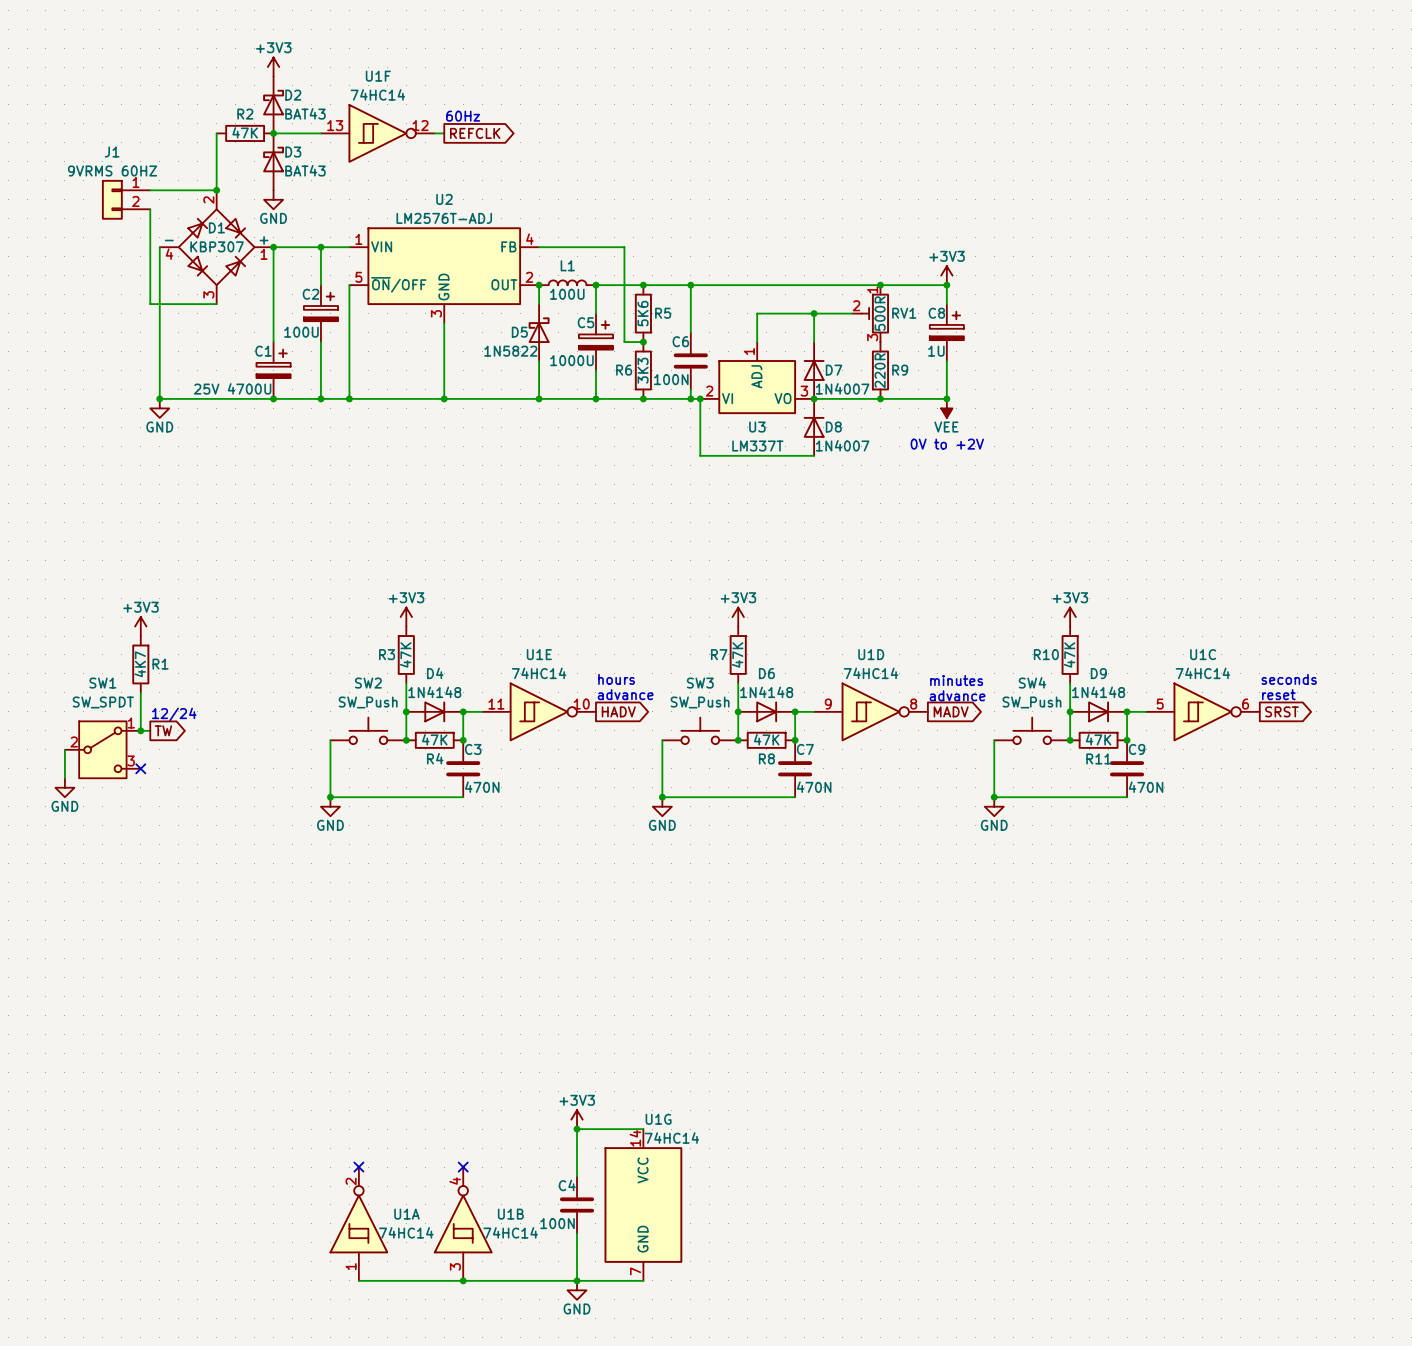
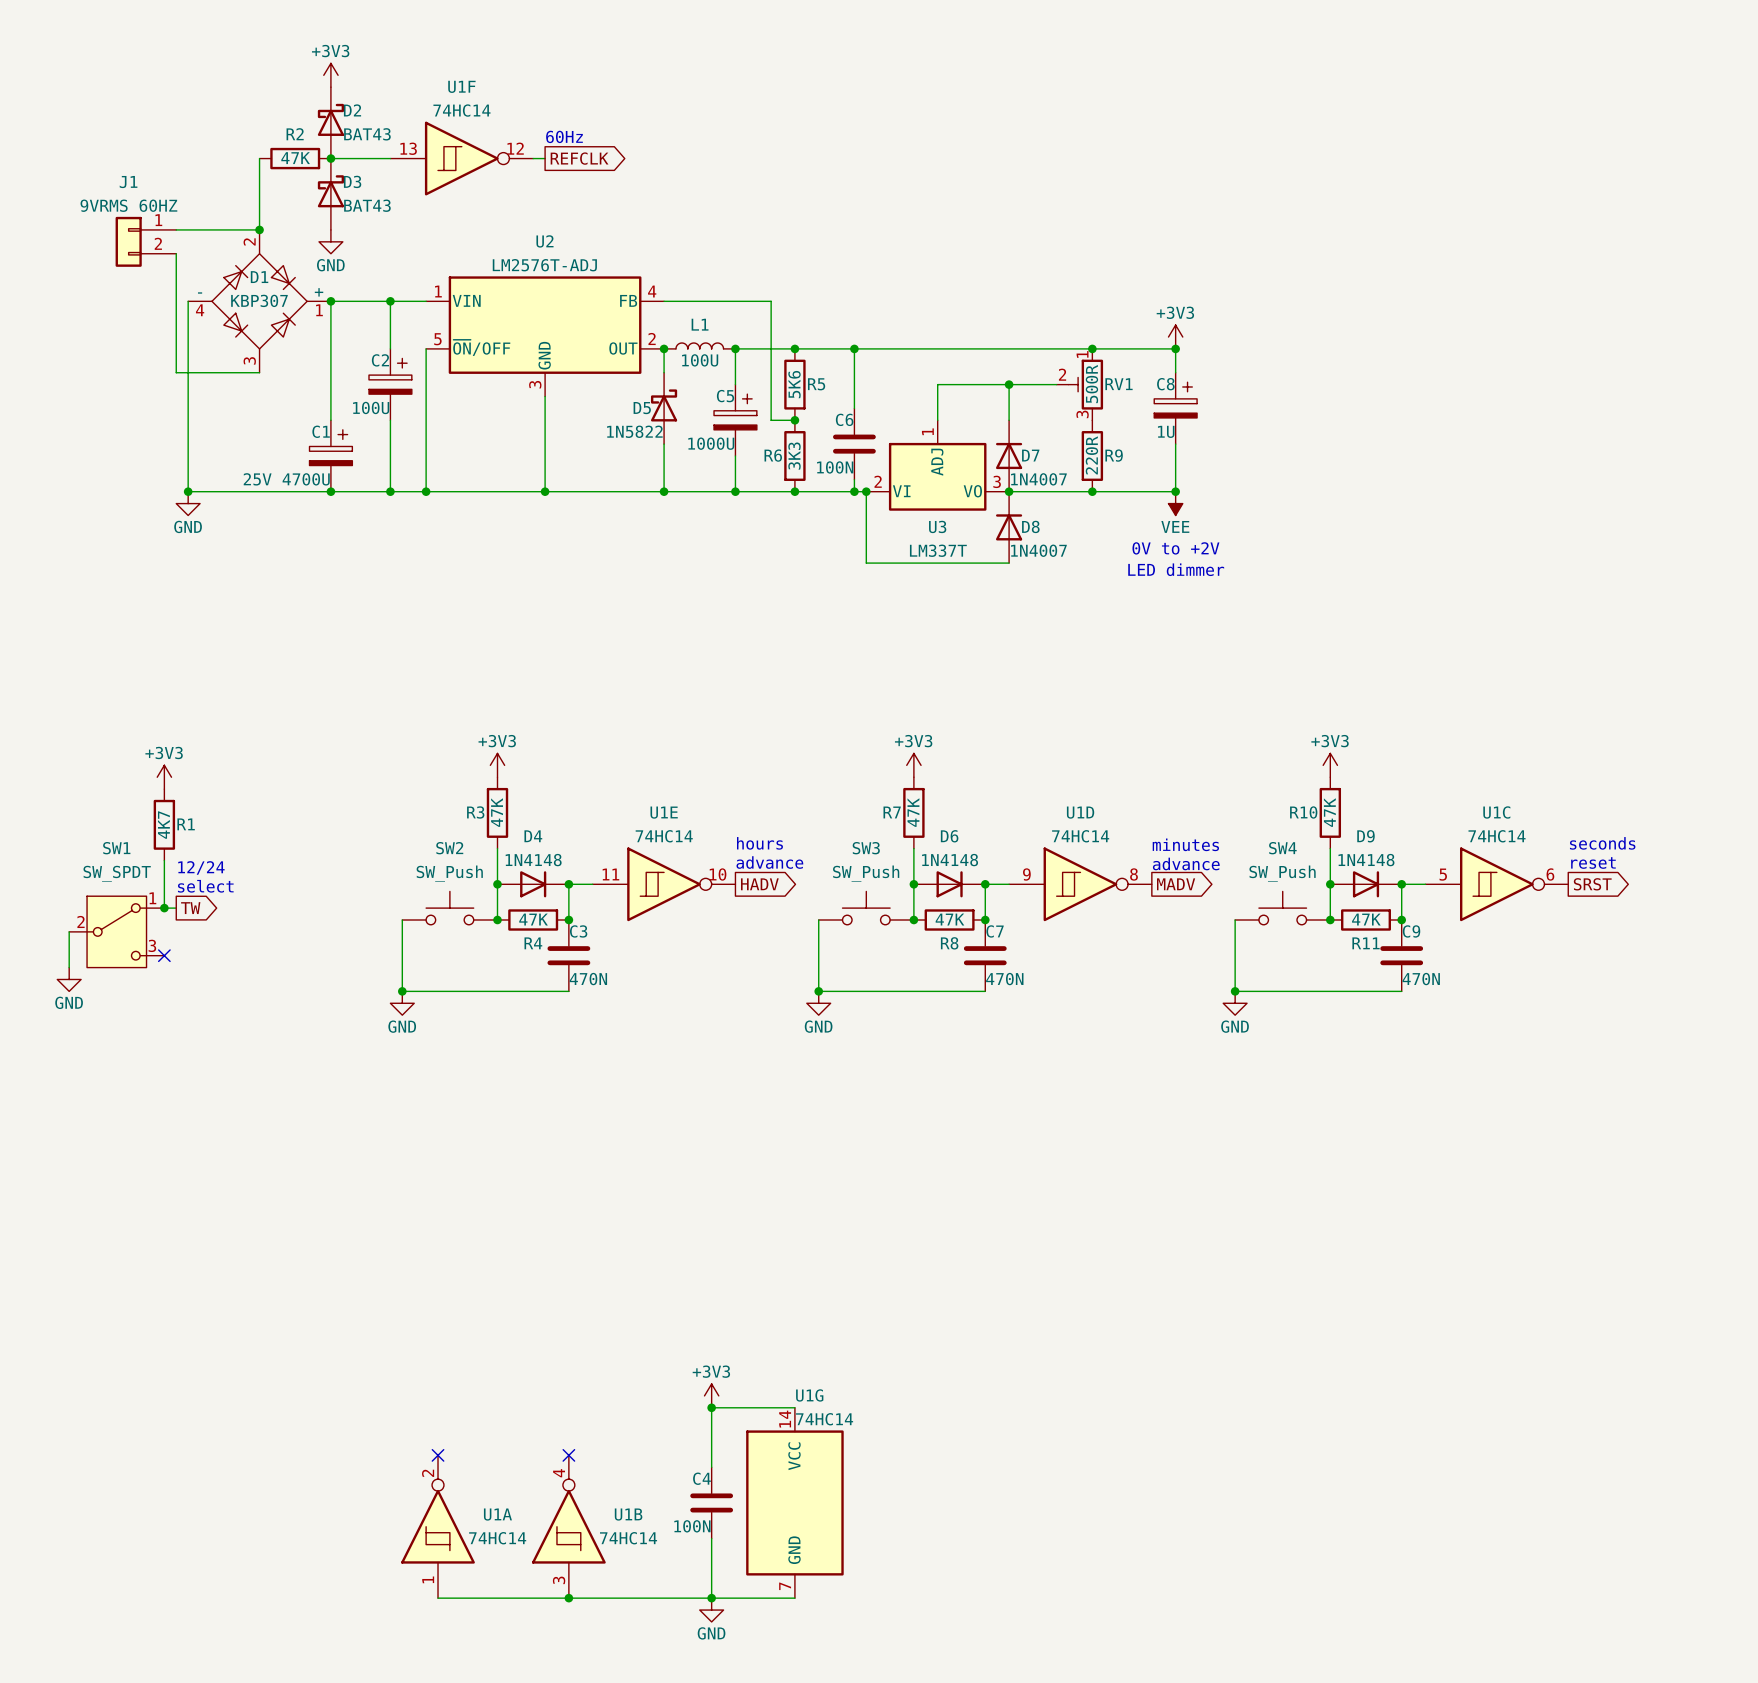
text: none -> LED dimmer (1176, 569)
text: none -> 12/24 (201, 867)
text: 12/24 (174, 714) -> select (205, 886)

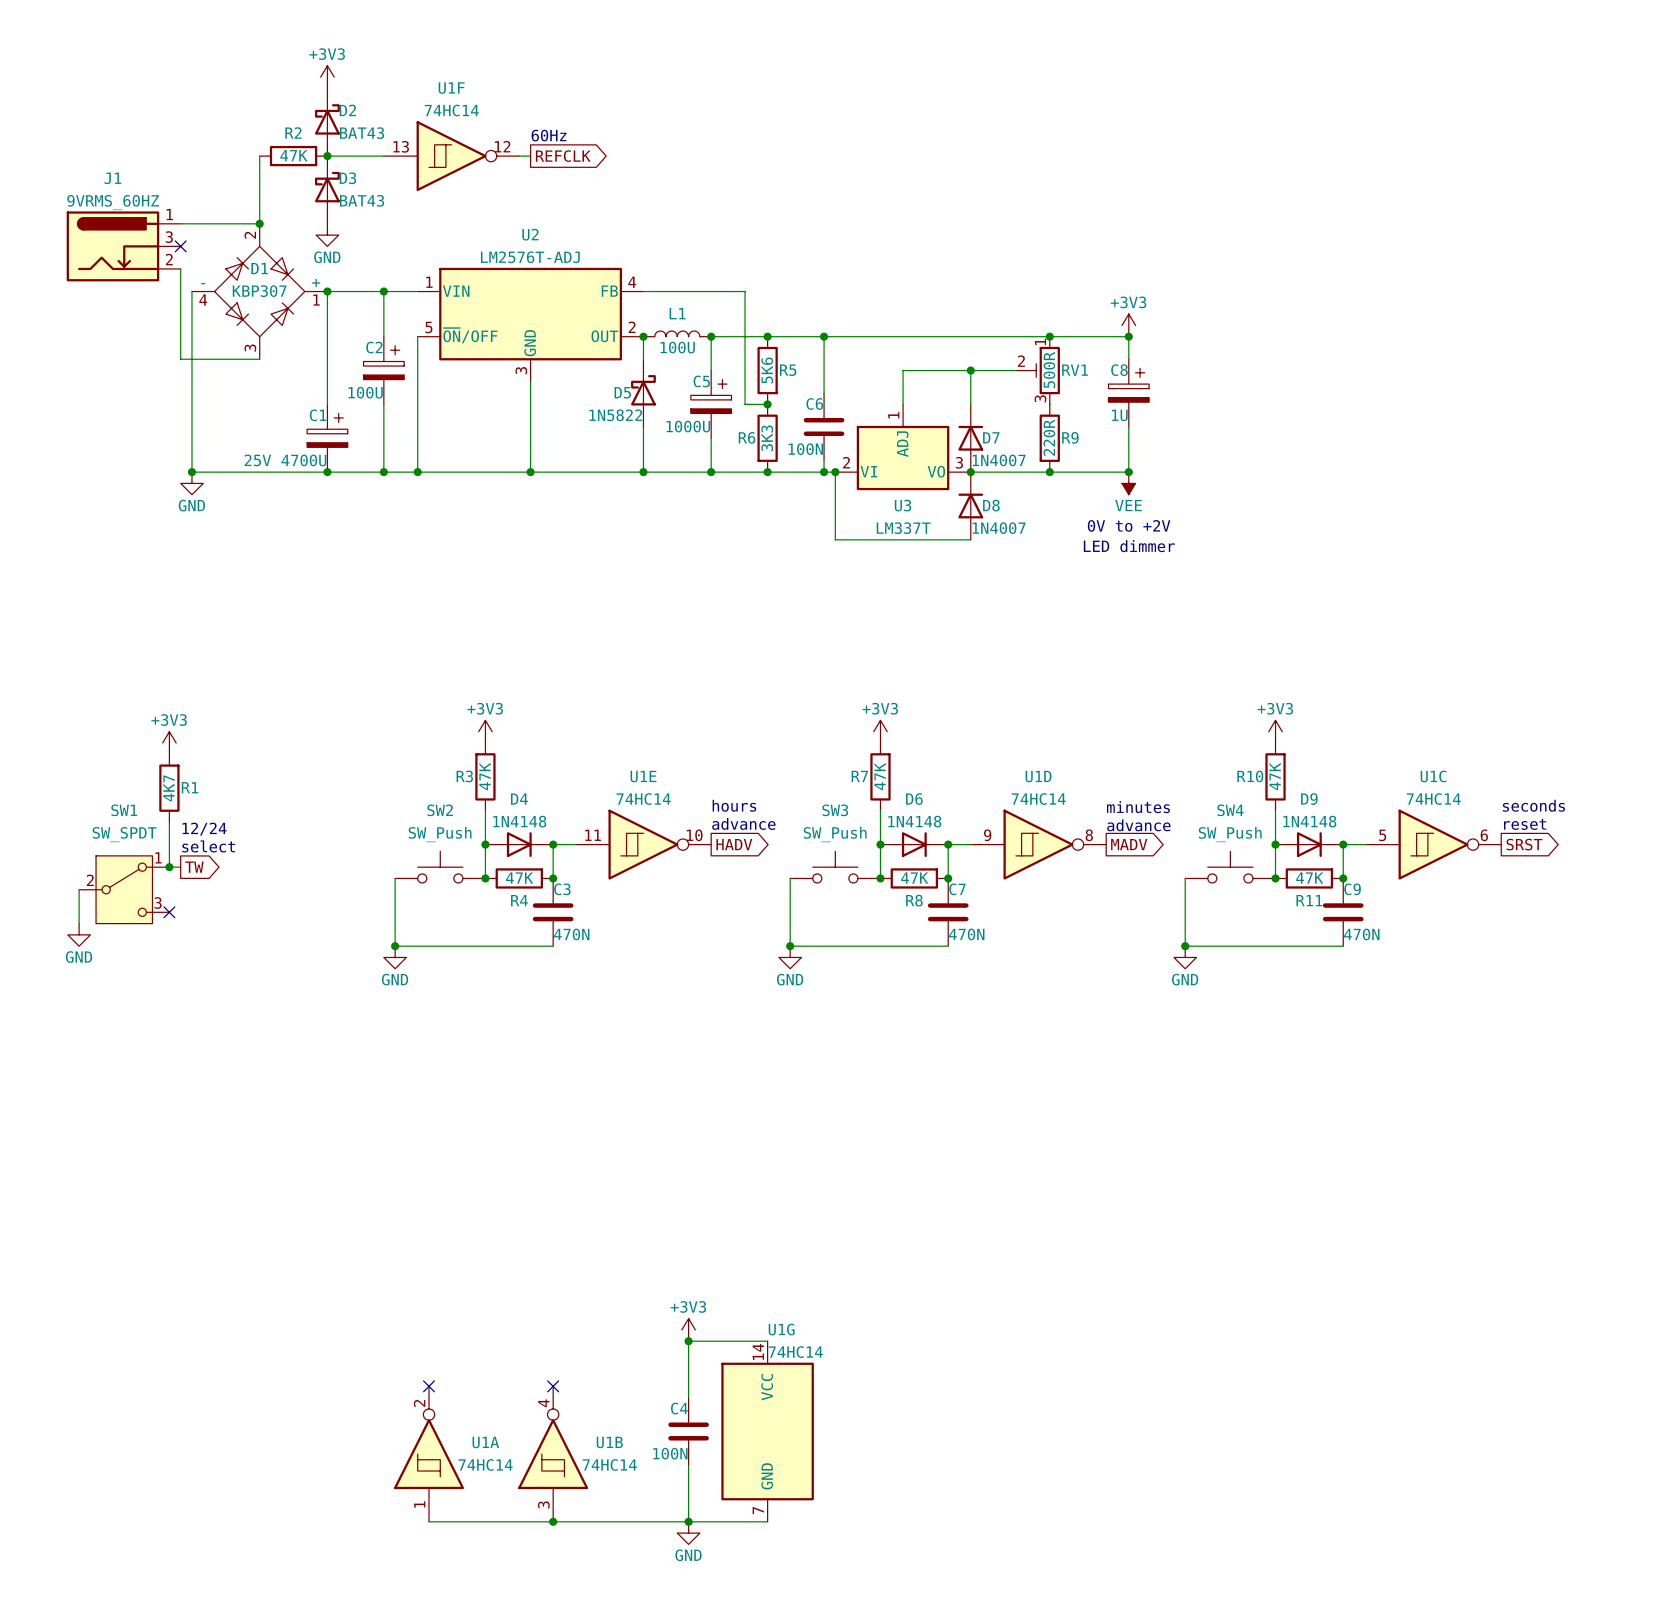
J1 value: 9VRMS 60HZ (128, 205) -> 9VRMS_60HZ (113, 202)
J1 symbol: [115, 216, 177, 267] -> [66, 211, 181, 282]
wire: (176, 253) (176, 277) -> none
no-connect mark: none -> (180, 246)

